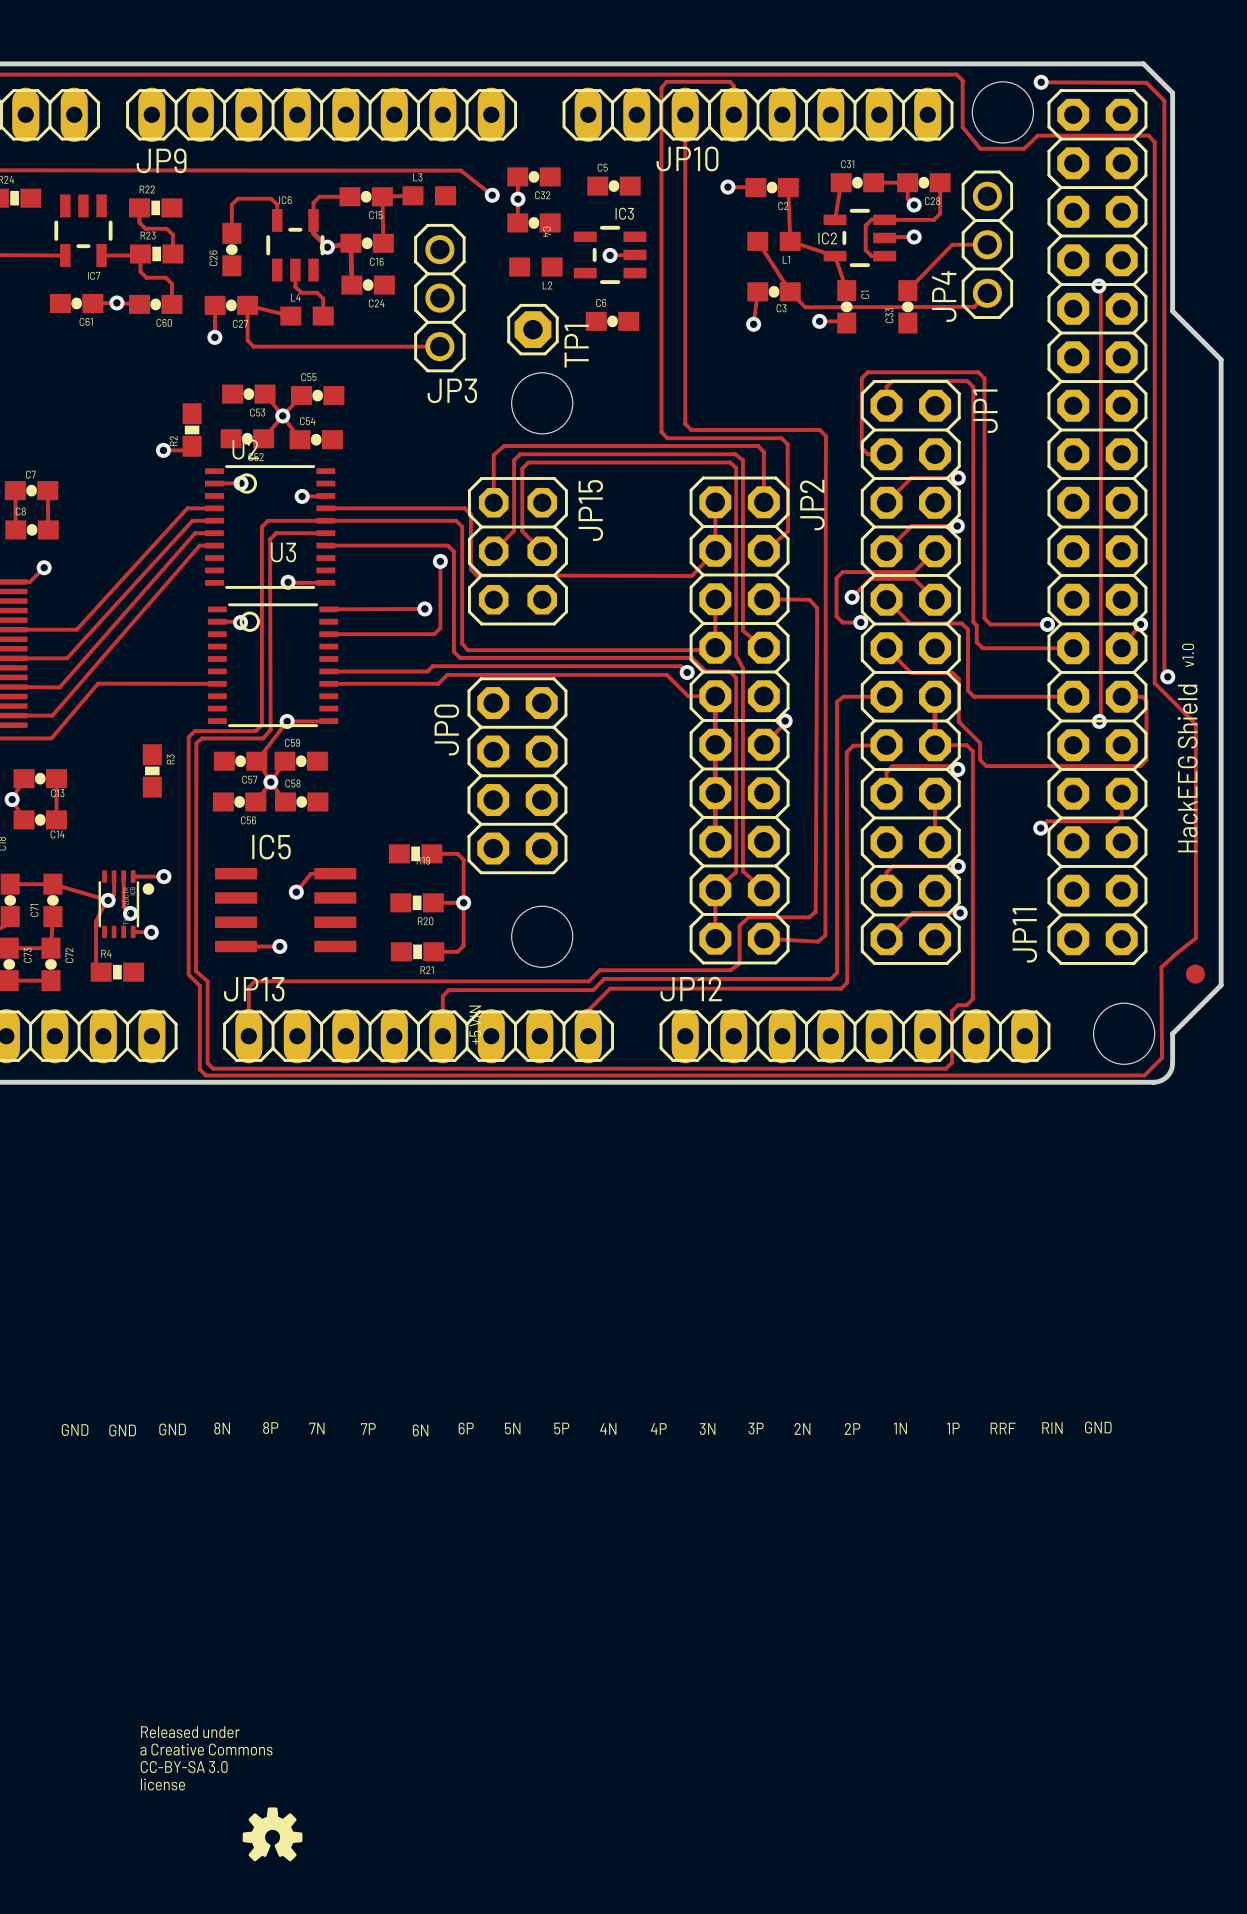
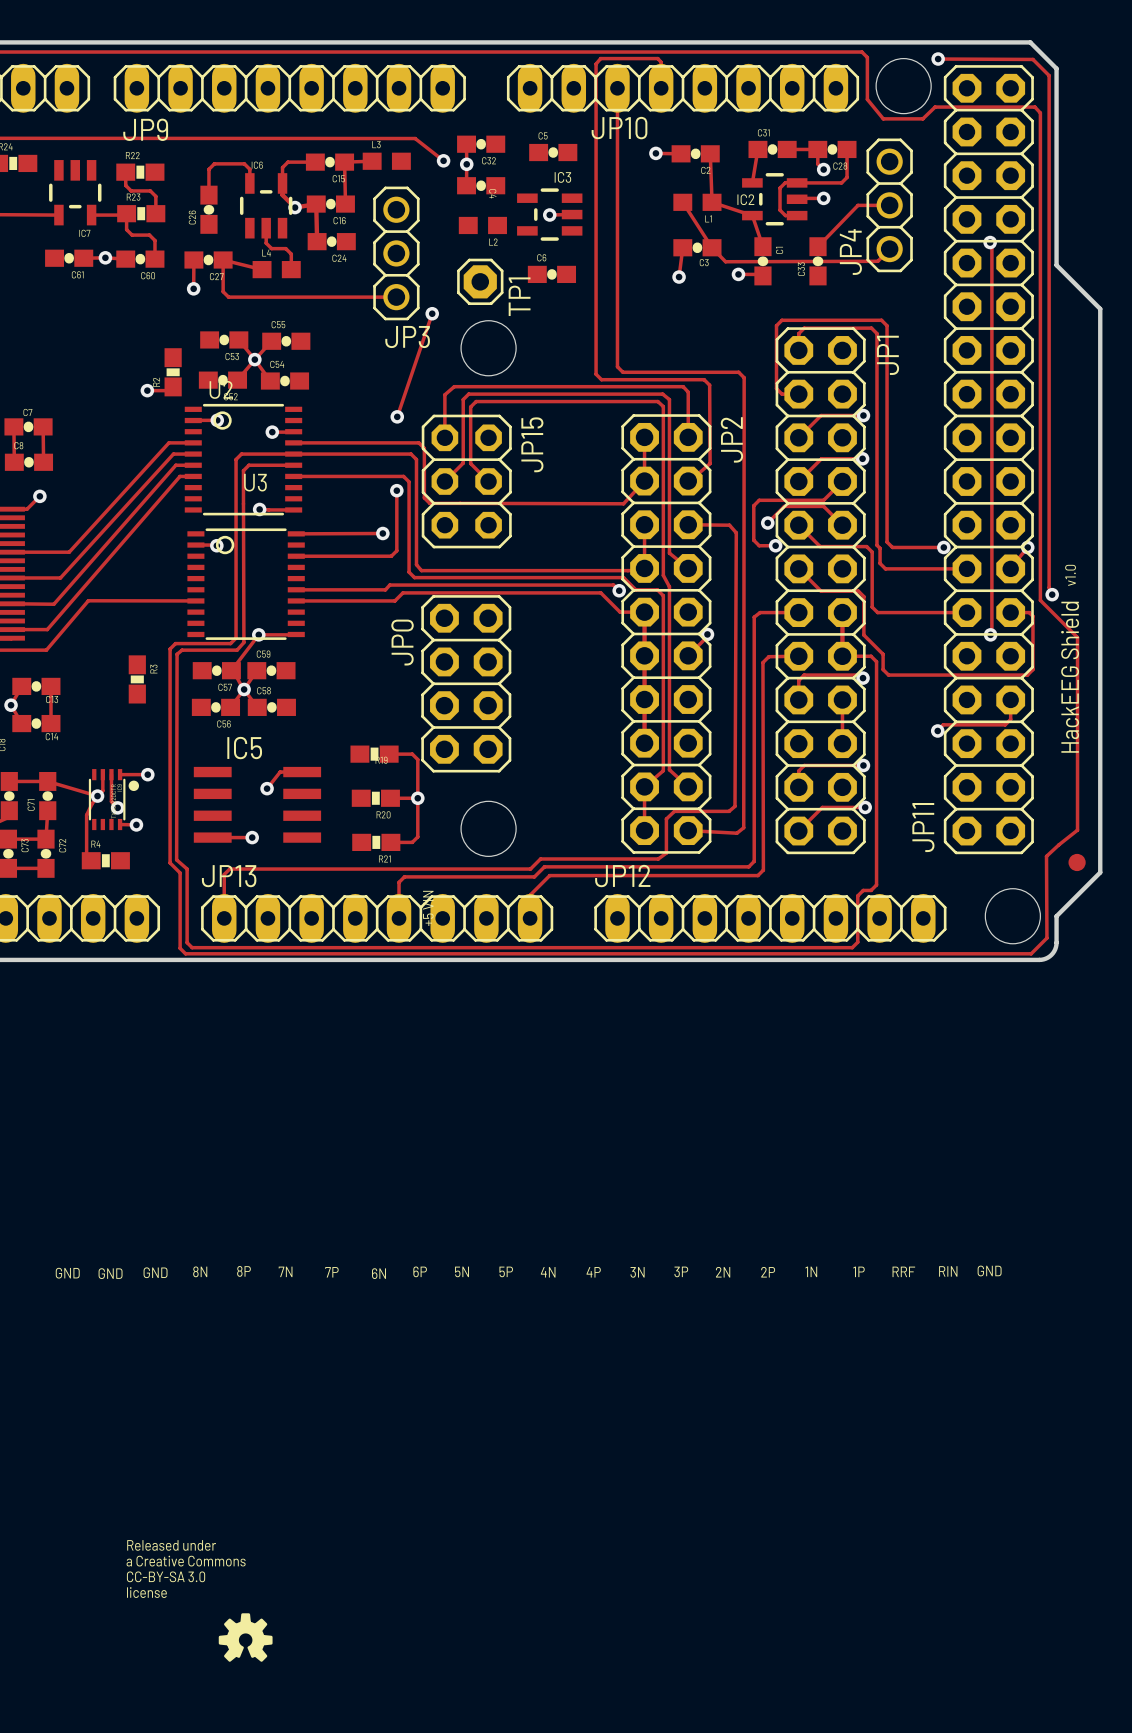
track: none -> (432, 313) (397, 416)
via: none -> (432, 313)
via: none -> (397, 416)

